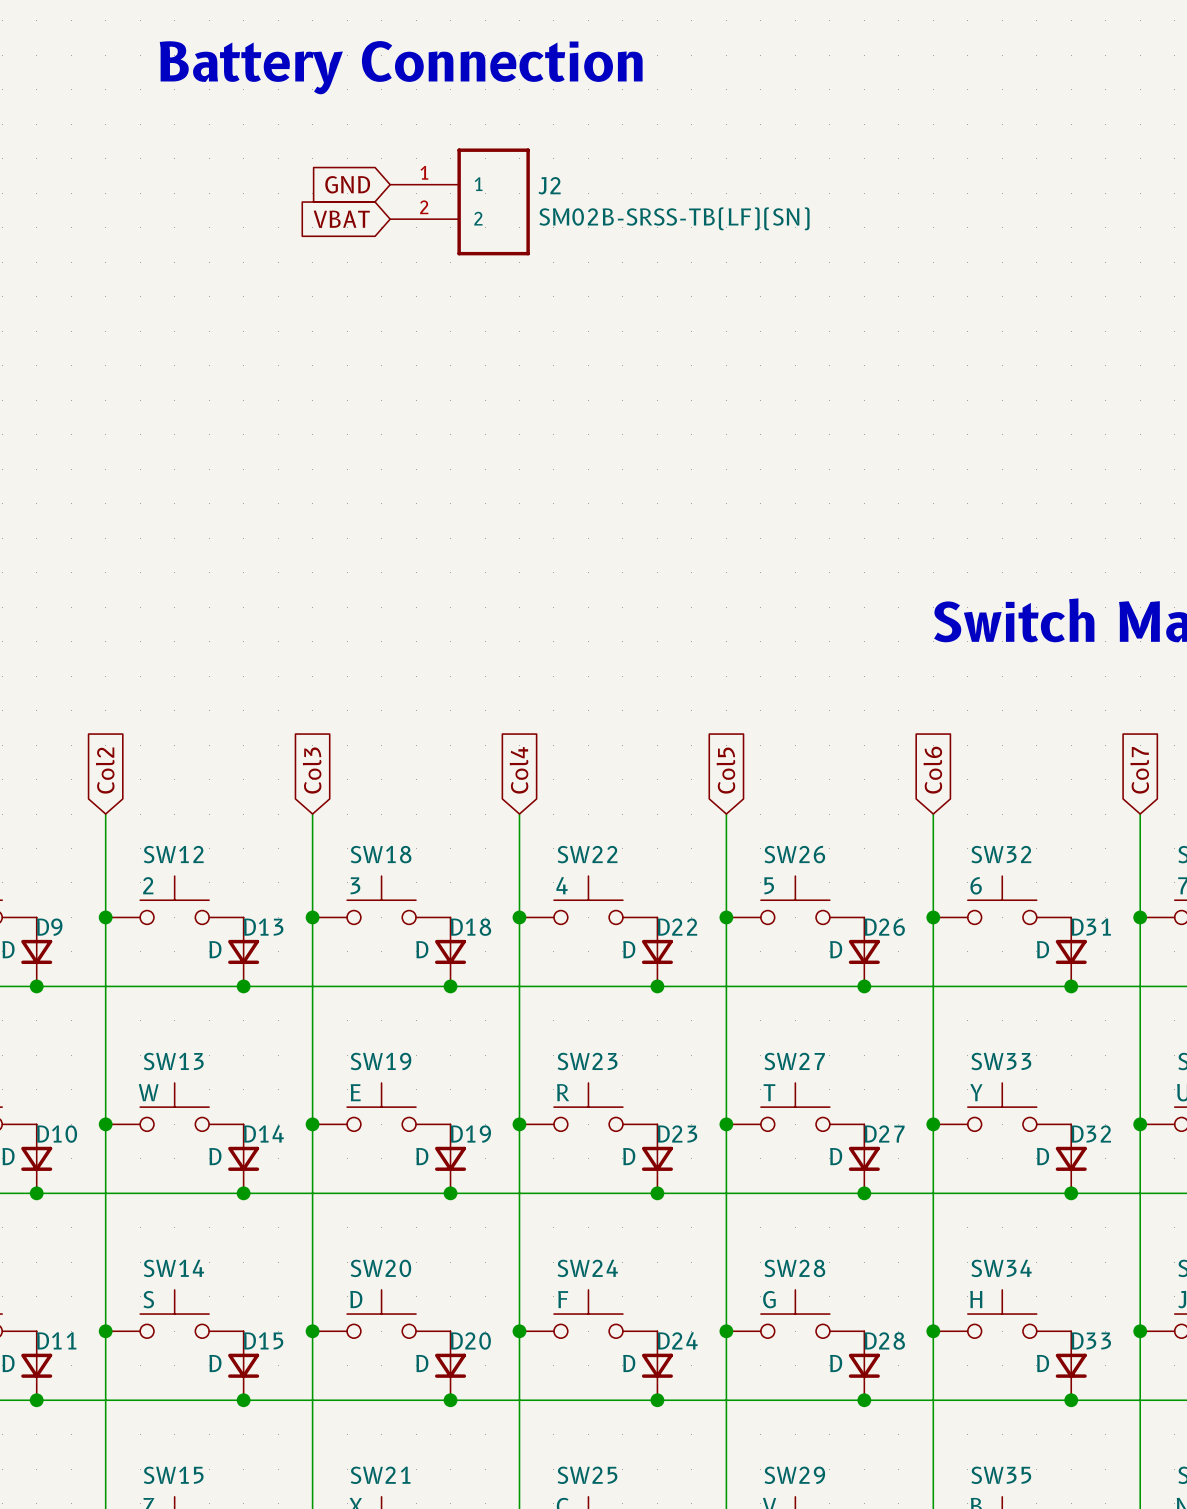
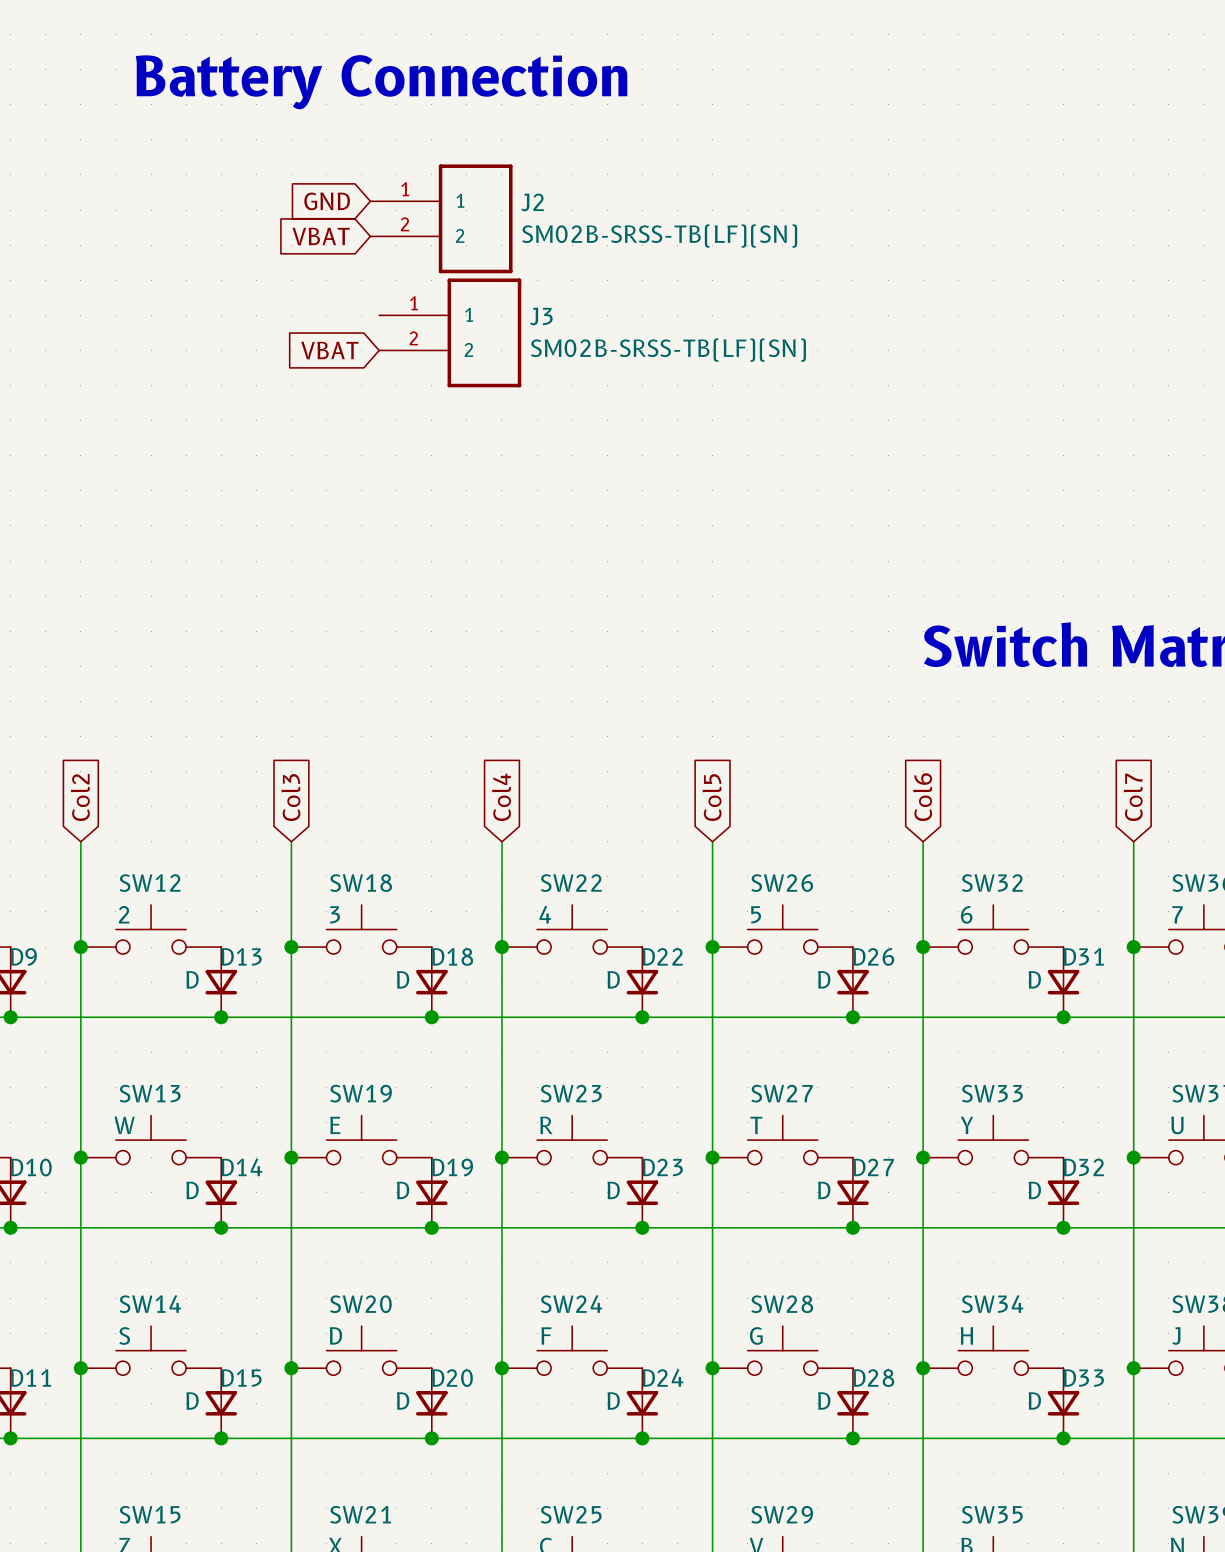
J3: none -> SM02B-SRSS-TB(LF)(SN) (450, 332)
global label: none -> VBAT (329, 350)

